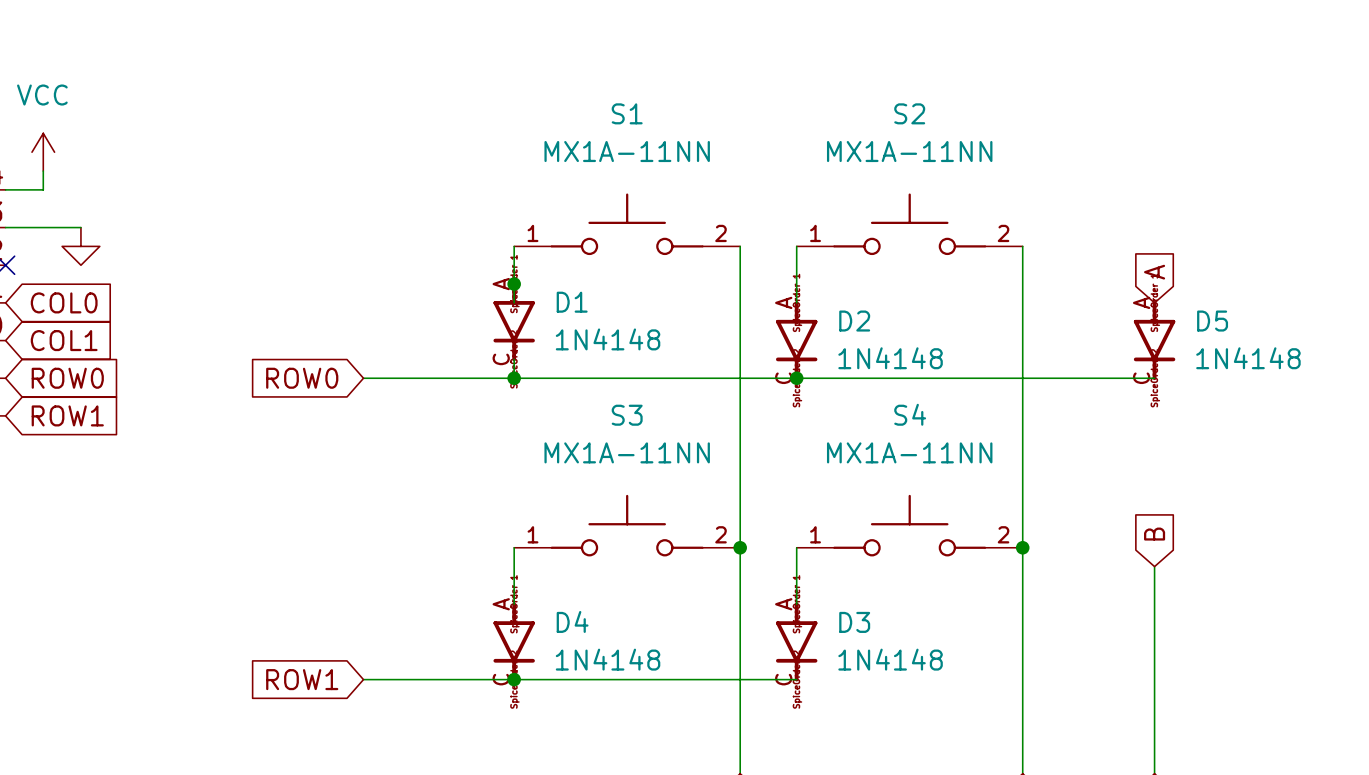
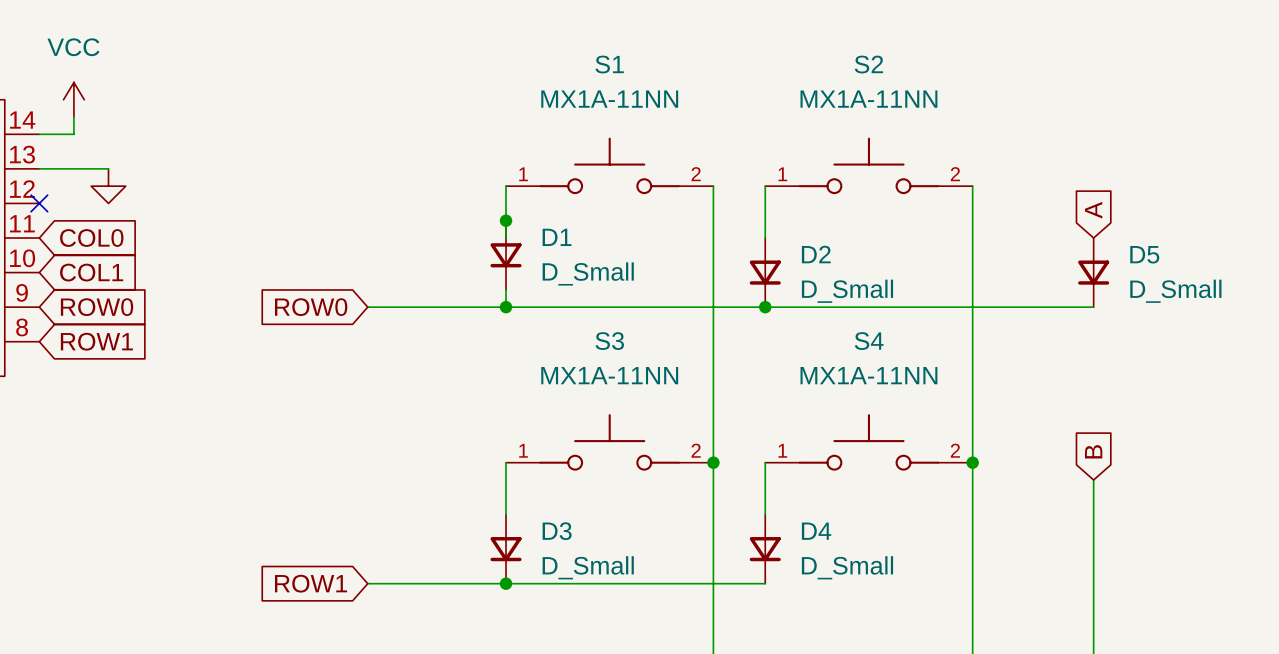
D1 symbol: [493, 282, 535, 362] -> [490, 220, 522, 290]
D2 symbol: [775, 301, 818, 381] -> [749, 238, 781, 308]
D5 symbol: [1133, 301, 1176, 381] -> [1078, 238, 1110, 308]
D1 value: 1N4148 (608, 339) -> D_Small (588, 273)
D2 value: 1N4148 (890, 358) -> D_Small (847, 291)
D5 value: 1N4148 (1248, 358) -> D_Small (1175, 291)
D4 symbol: [493, 602, 535, 682] -> [749, 514, 781, 584]
D3 symbol: [775, 602, 818, 682] -> [490, 514, 522, 584]
D4 value: 1N4148 (608, 659) -> D_Small (847, 567)
D3 value: 1N4148 (890, 659) -> D_Small (588, 567)

